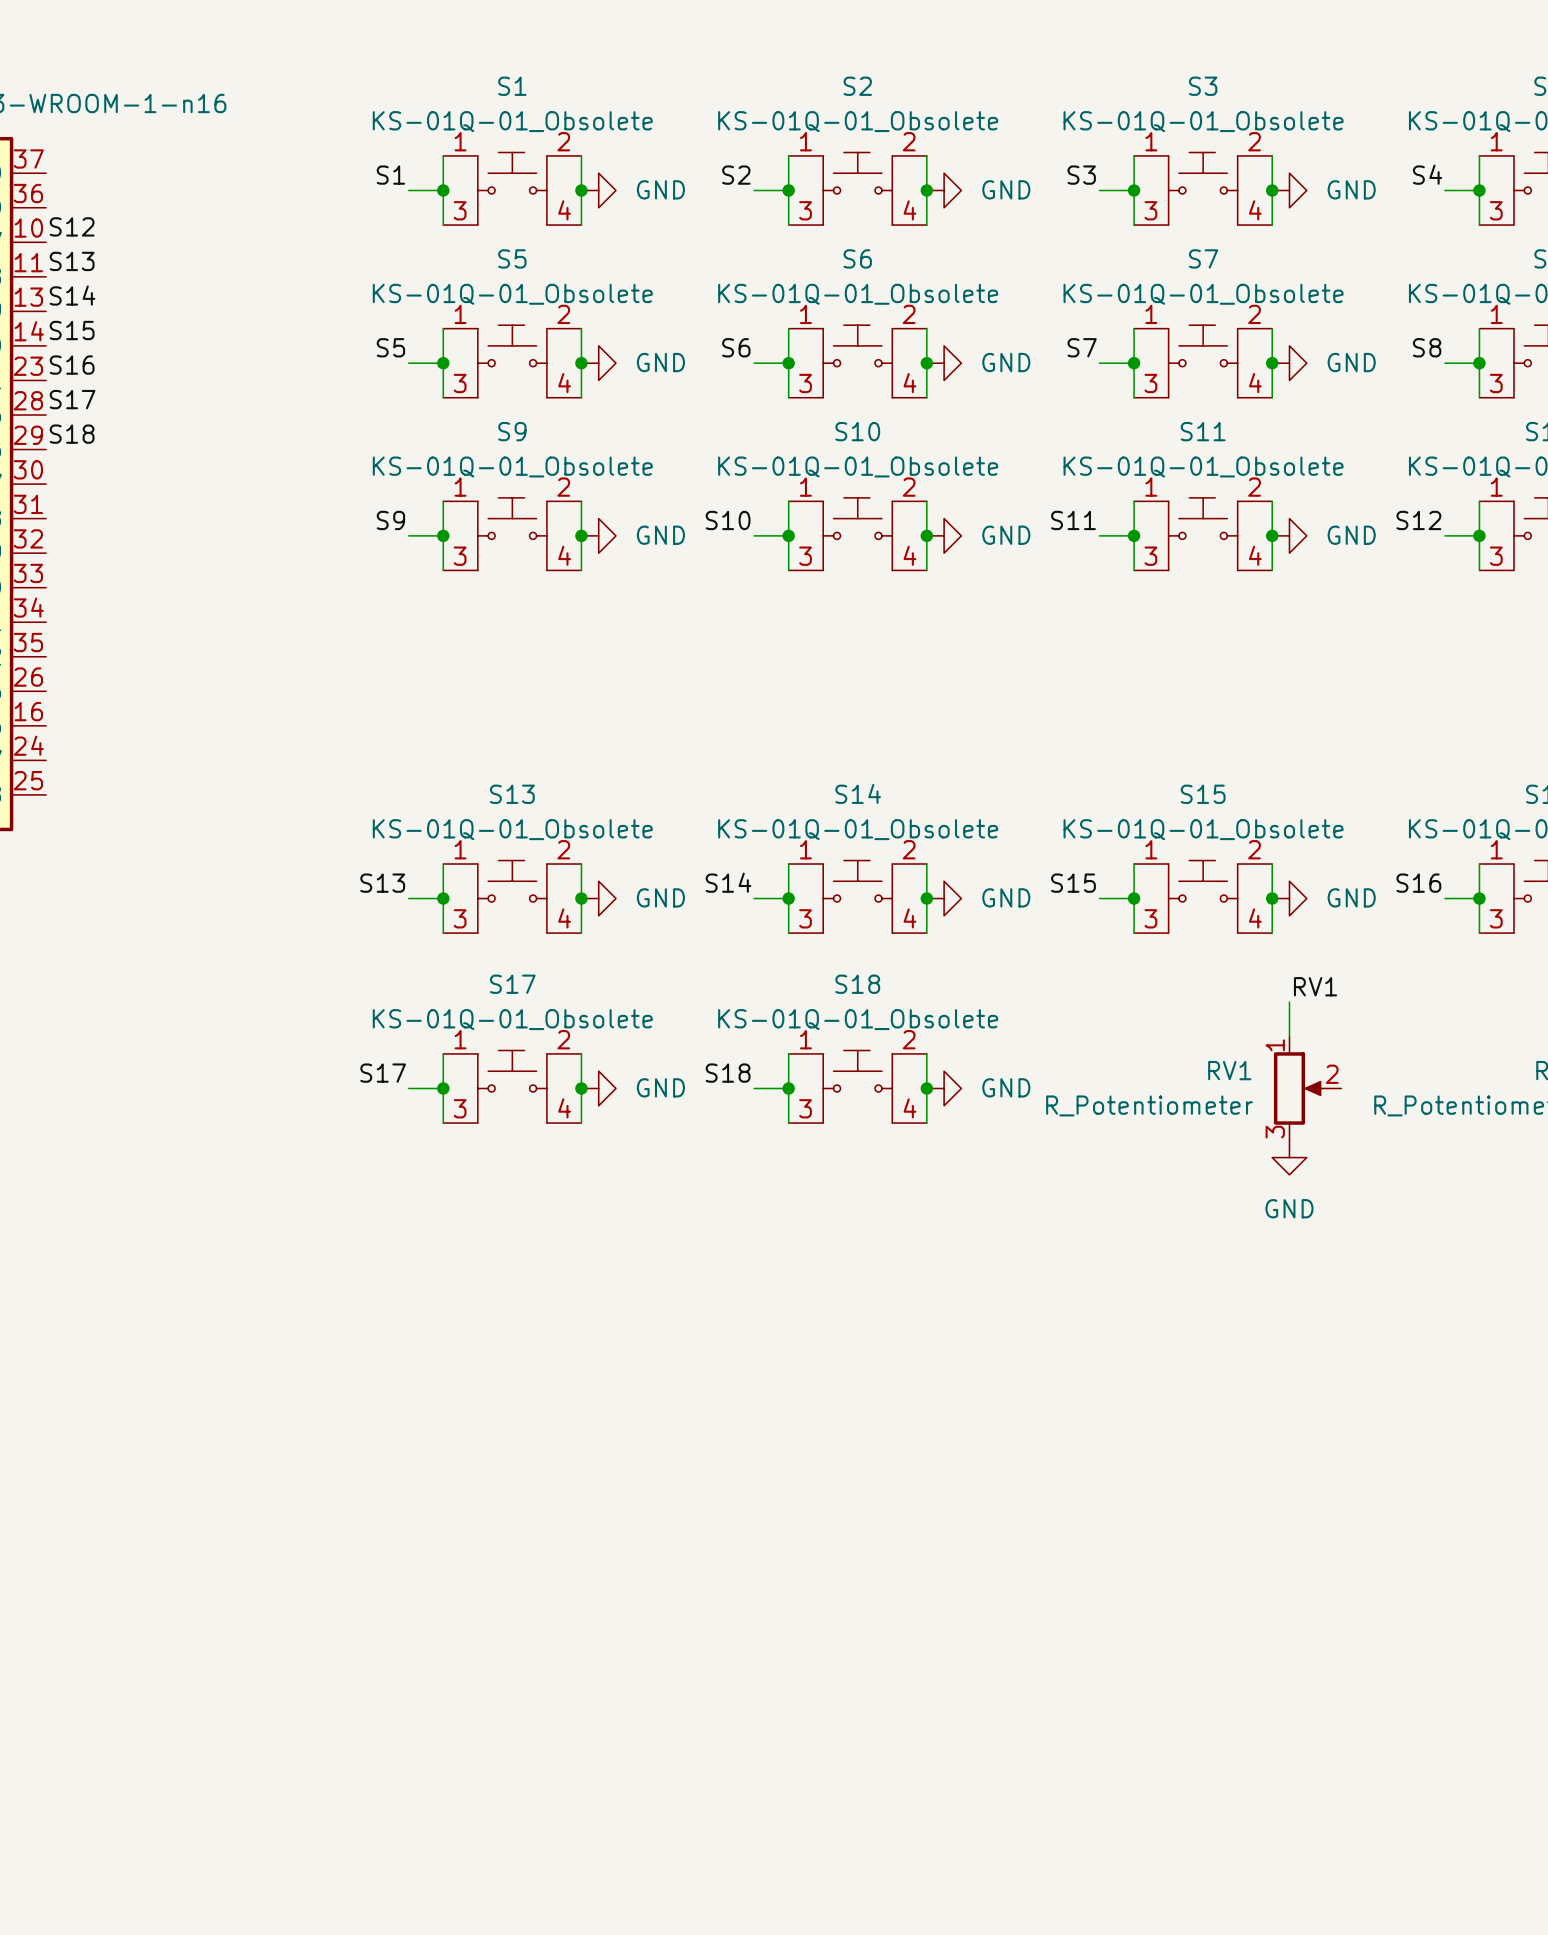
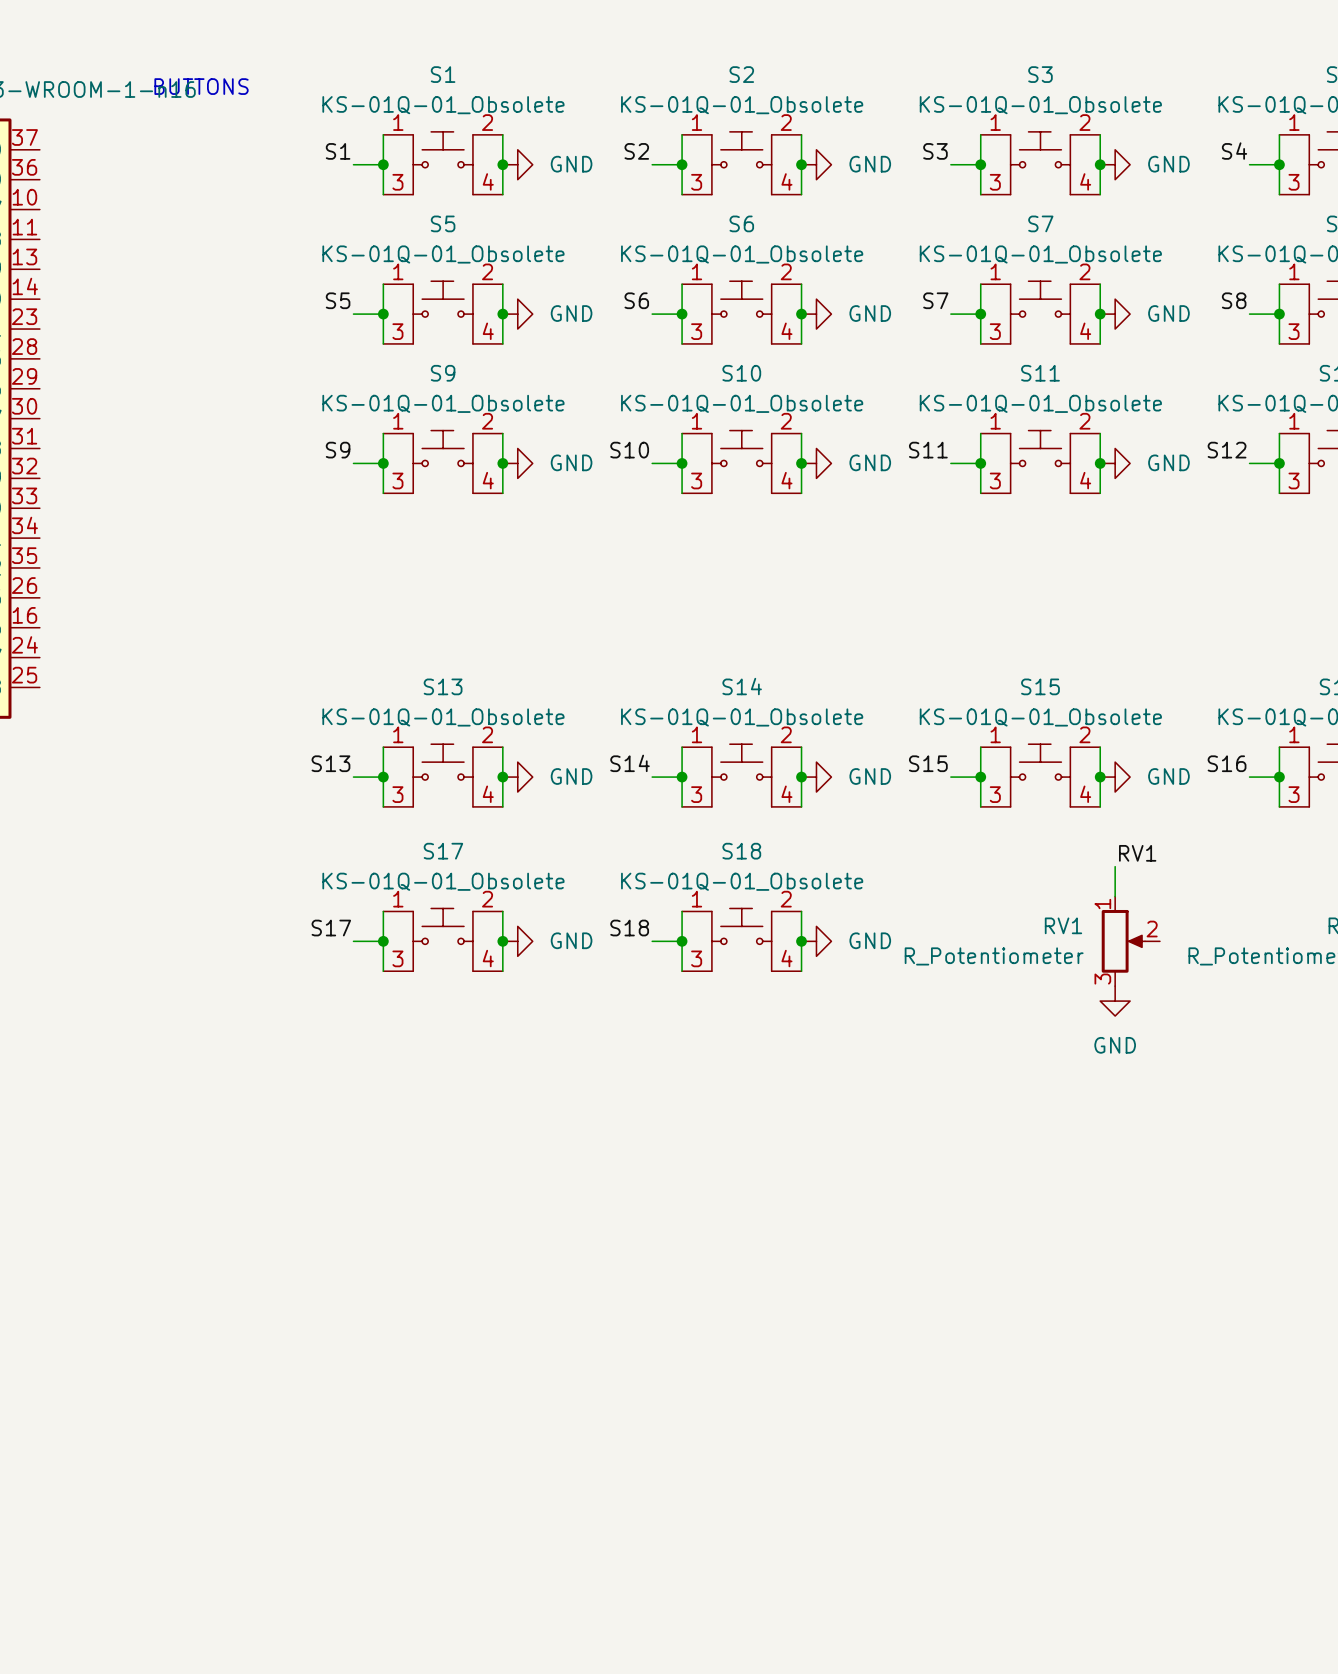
text: none -> BUTTONS (201, 86)
label: S12 (72, 226) -> none
label: S13 (72, 261) -> none
label: S14 (72, 295) -> none
label: S15 (72, 330) -> none
label: S16 (72, 365) -> none
label: S17 (72, 399) -> none
label: S18 (72, 434) -> none

